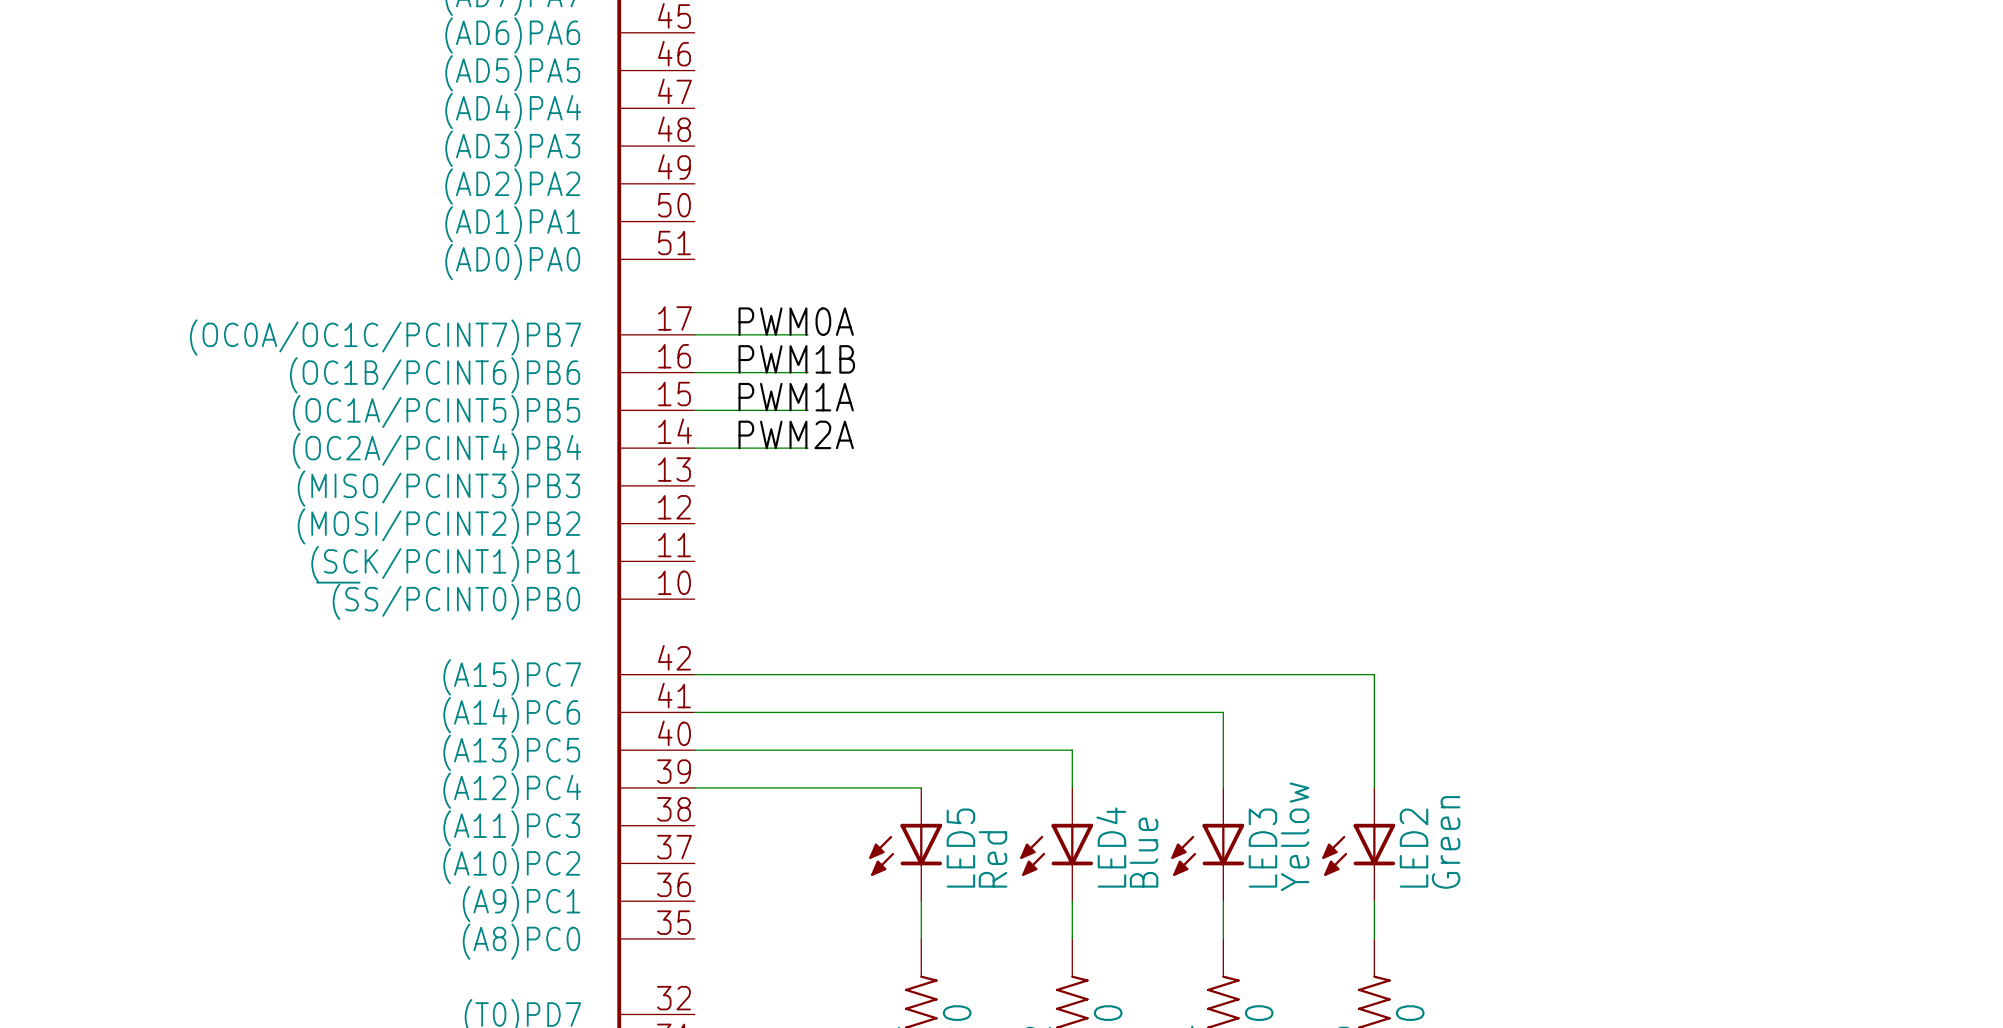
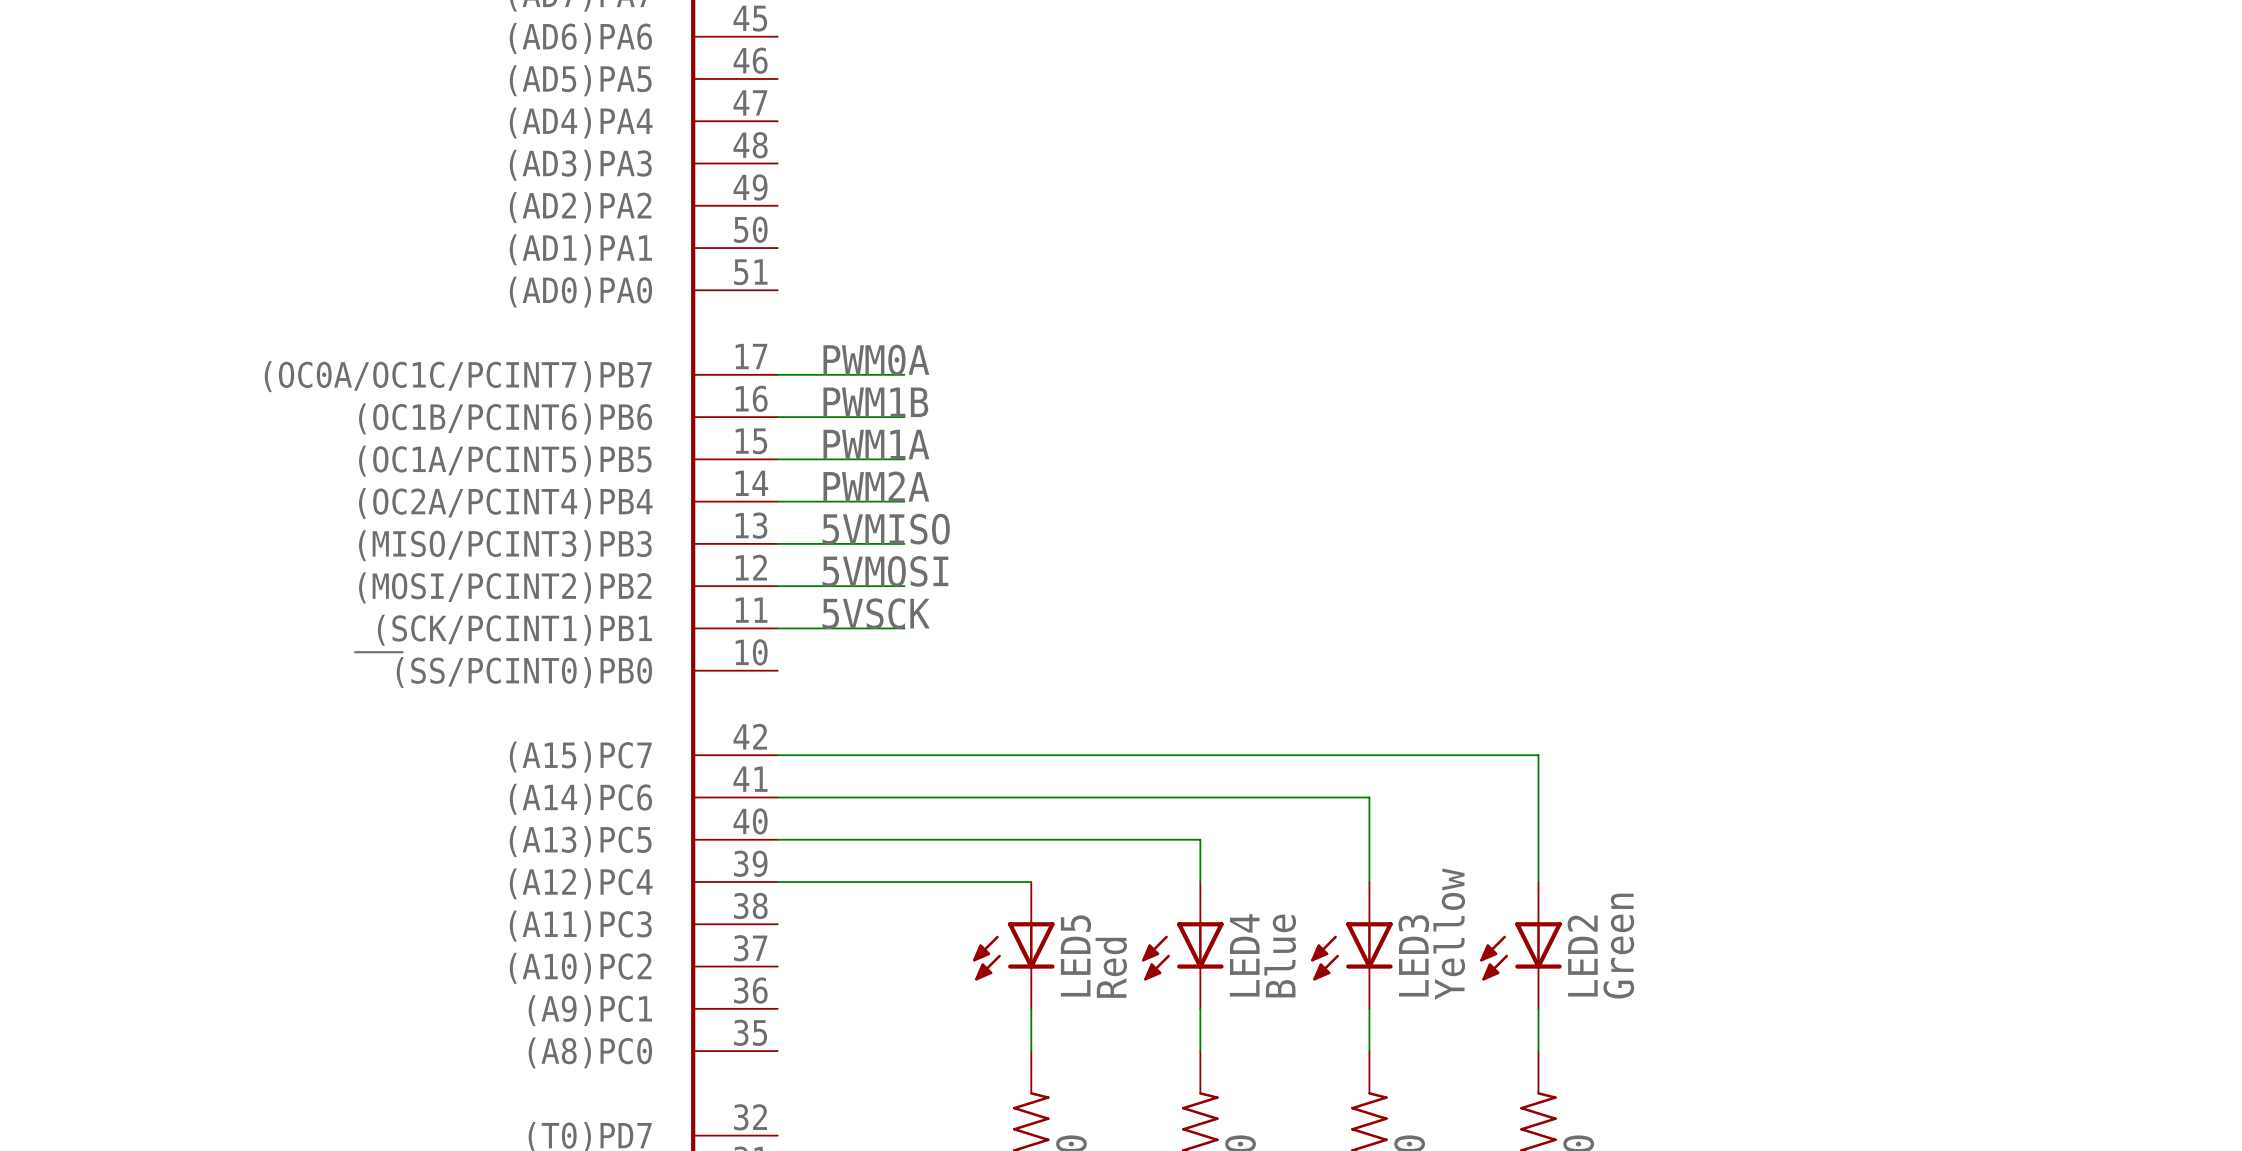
label: none -> 5VMISO (886, 529)
wire: none -> (777, 543) (904, 543)
label: none -> 5VMOSI (885, 571)
wire: none -> (777, 586) (904, 586)
label: none -> 5VSCK (876, 613)
wire: none -> (777, 628) (904, 628)

